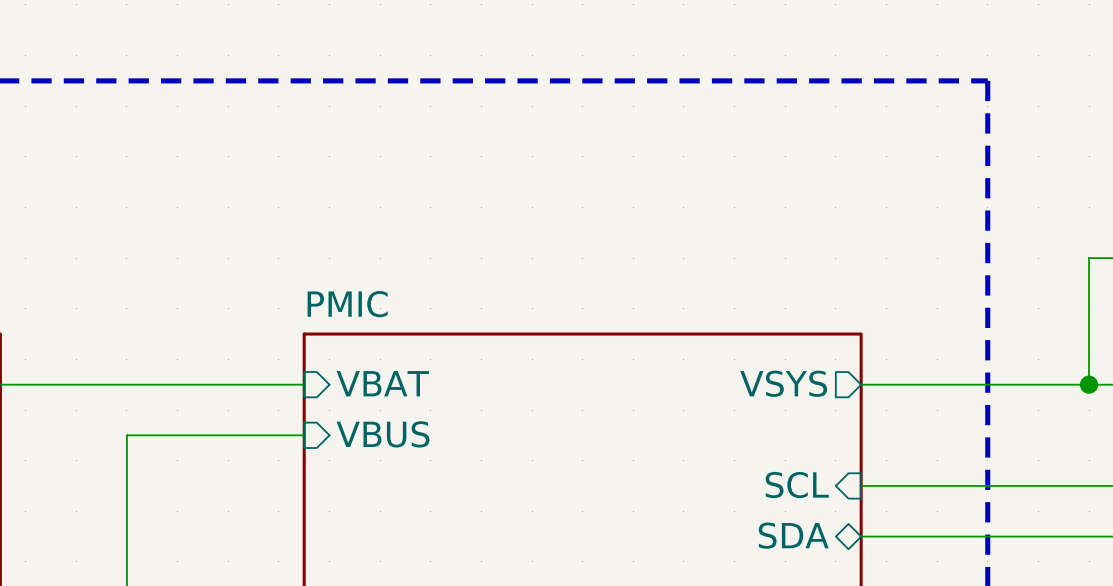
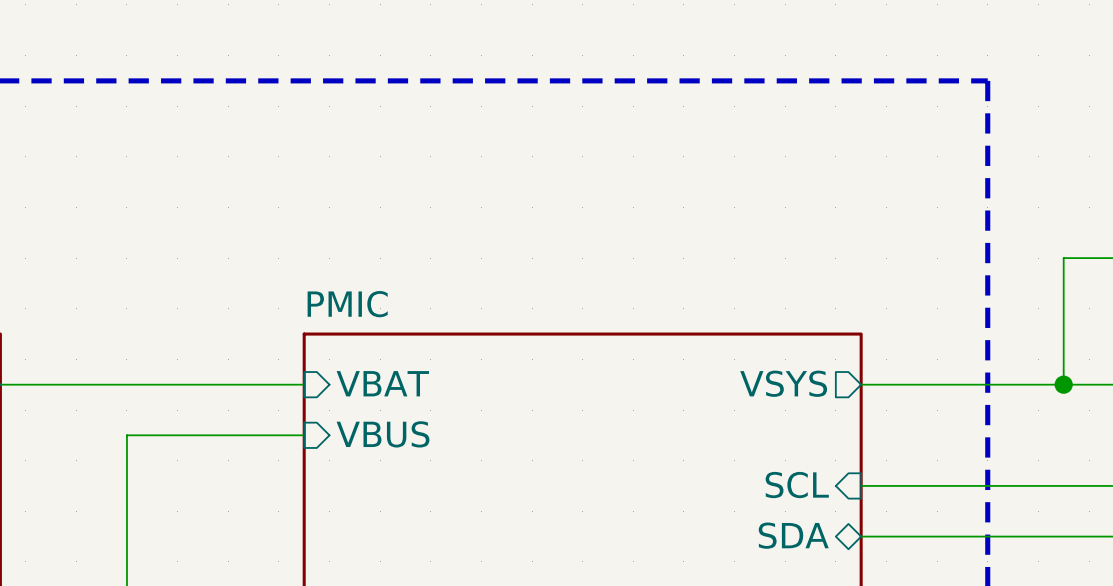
wire: (1089, 258) (1089, 384) -> (1089, 258) (1063, 258) (1063, 384)
junction position: (1089, 384) -> (1063, 384)

